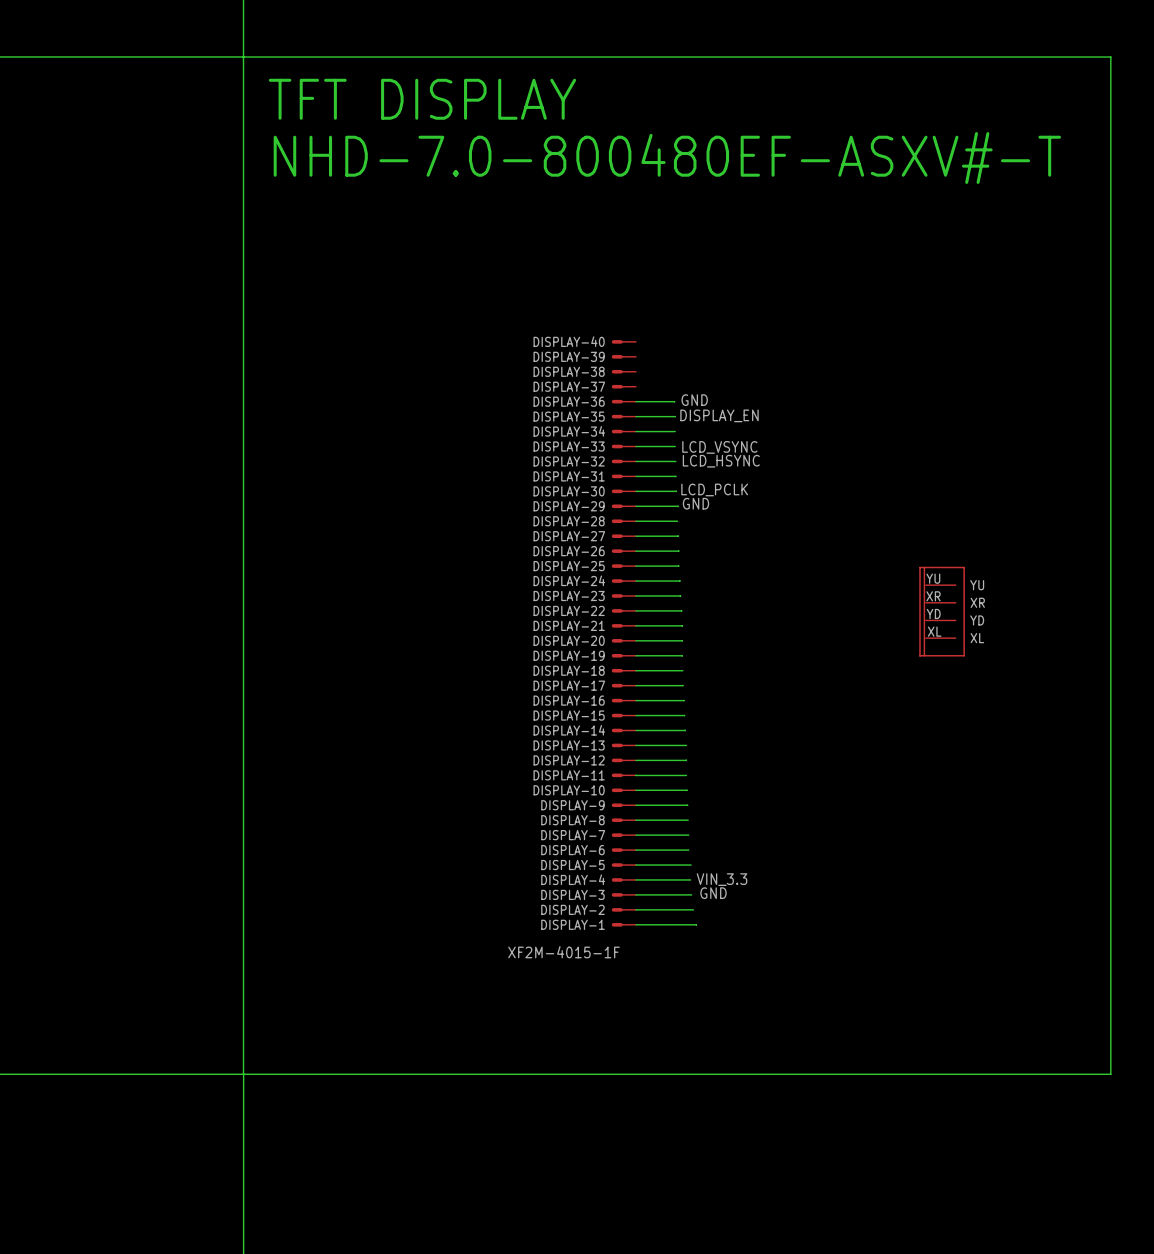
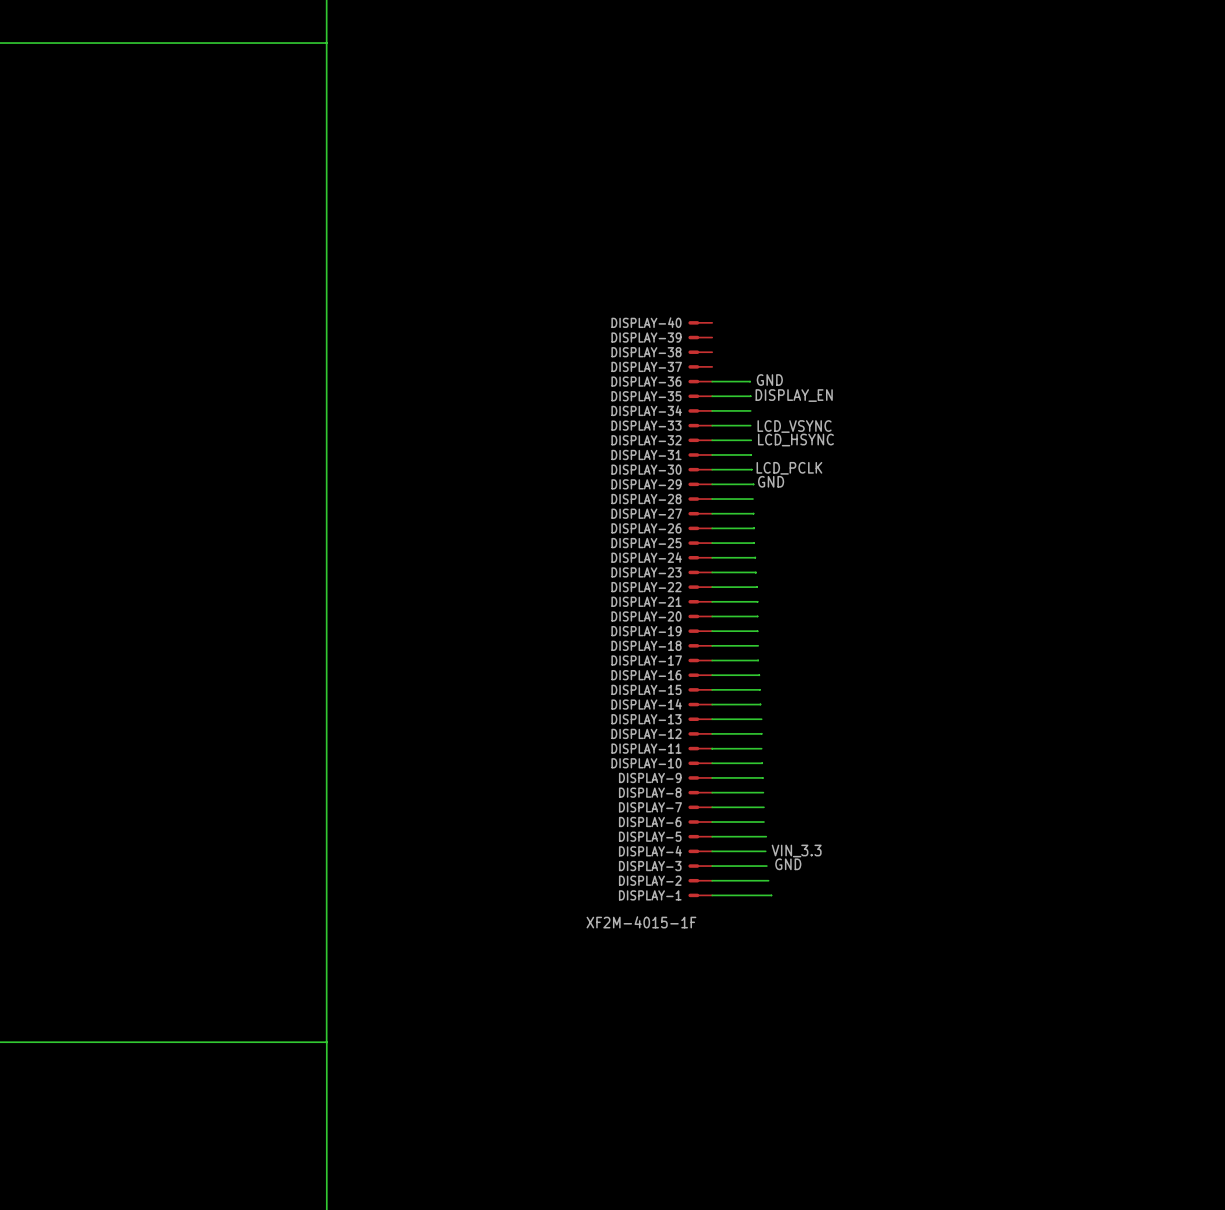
wire: (243, 57) (1110, 57) (1110, 1074) (243, 1074) -> none
text: TFT DISPLAY (422, 99) -> none
text: NHD-7.0-800480EF-ASXV#-T (667, 158) -> none
part: (942, 611) -> none

